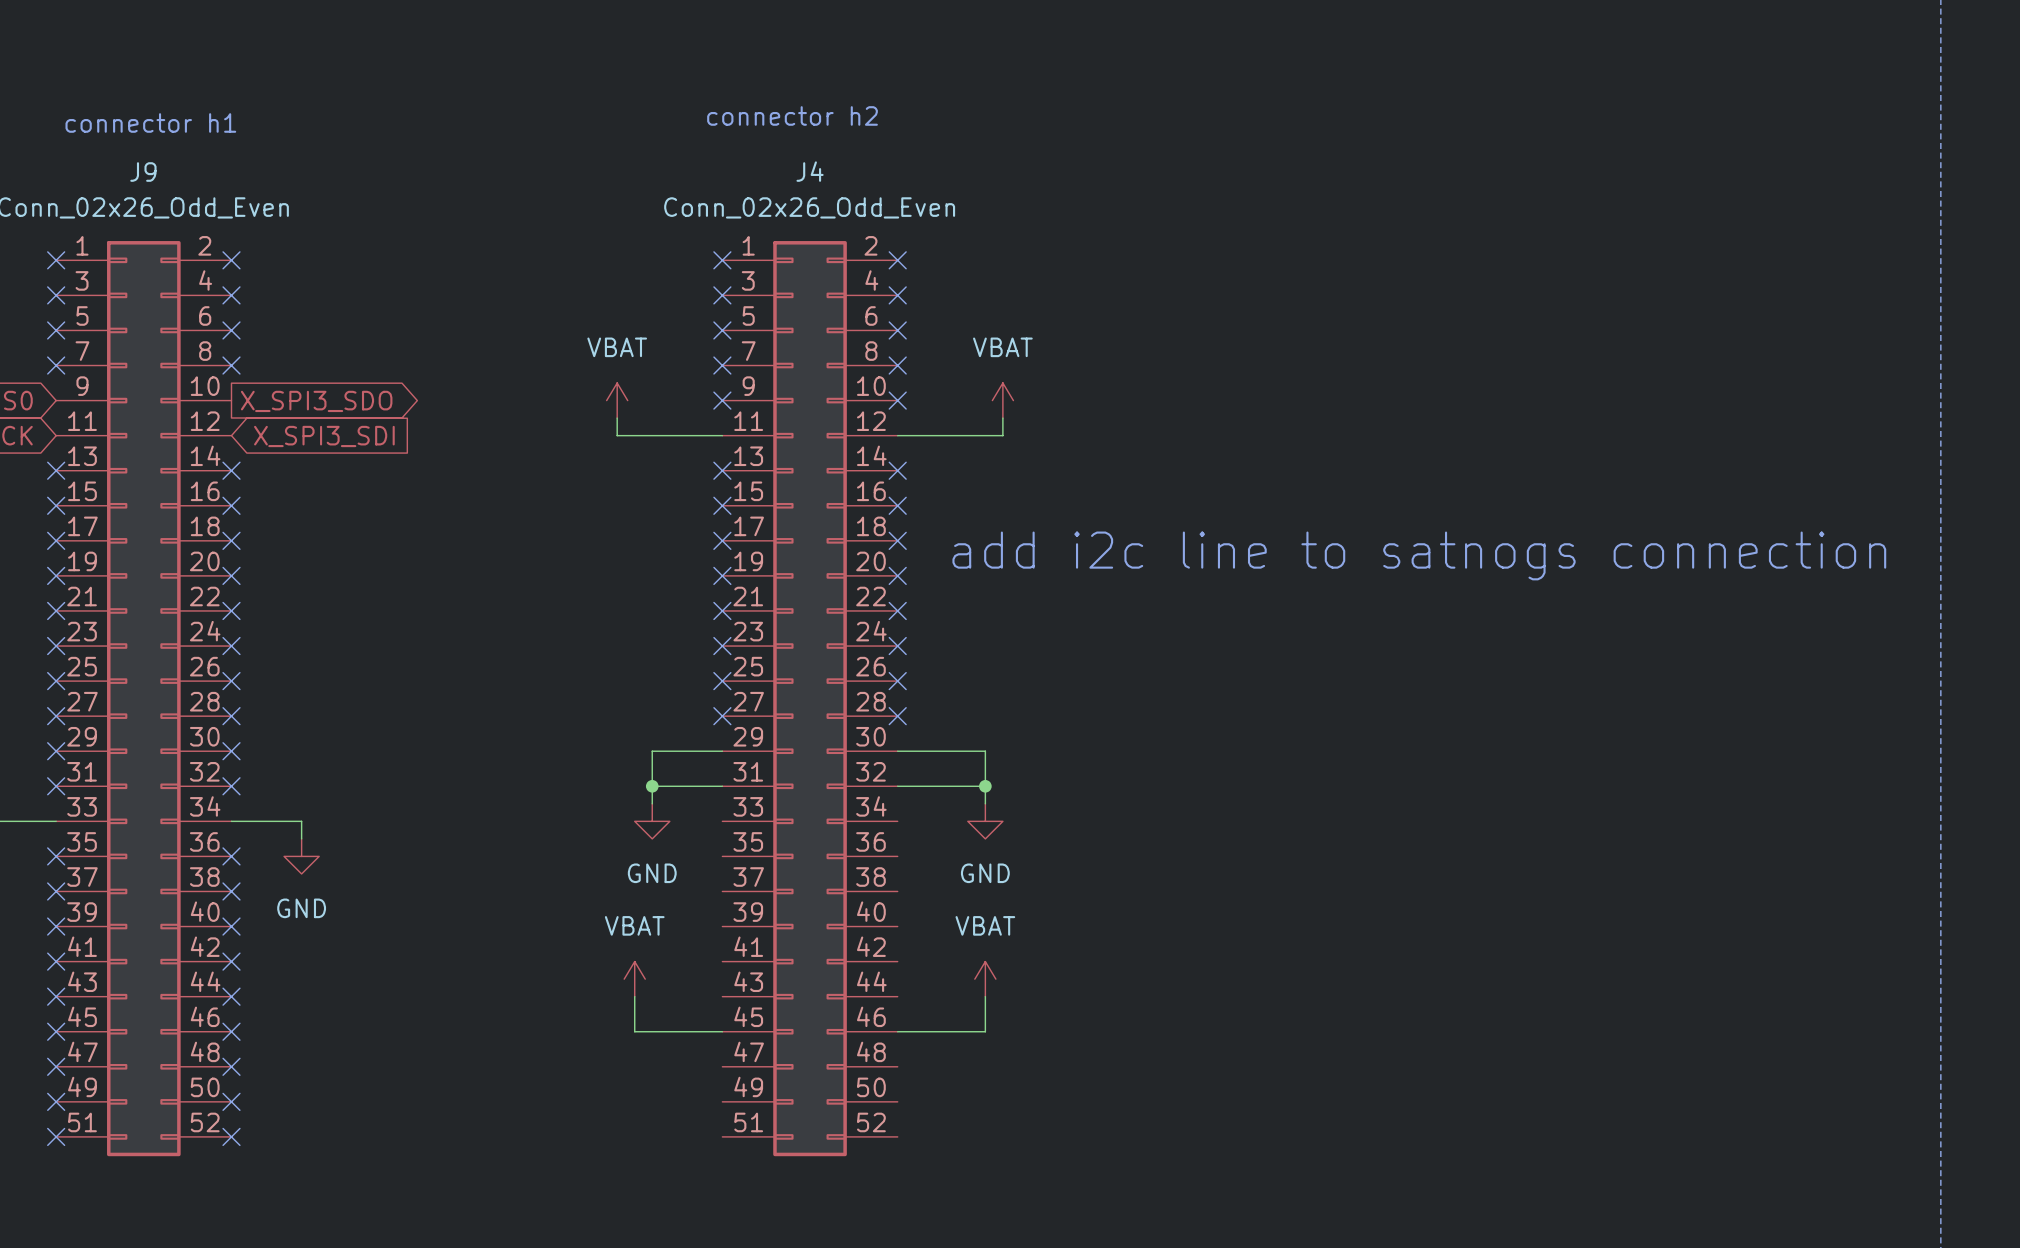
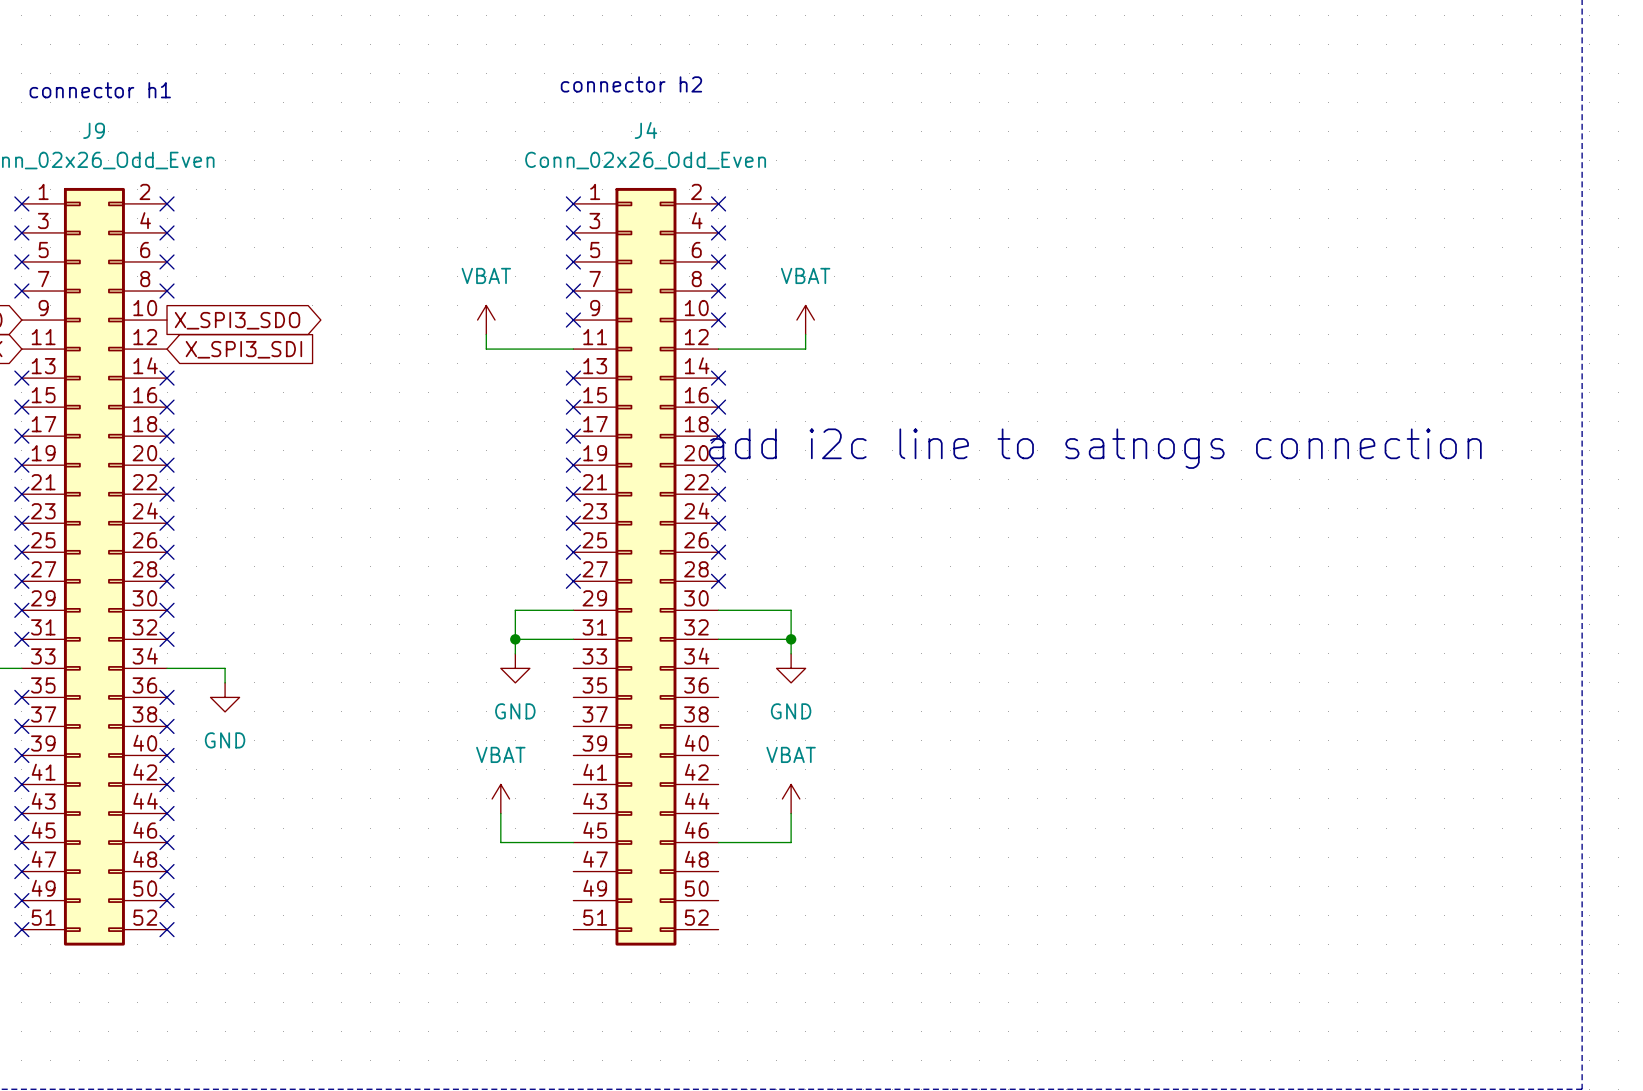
text position: add i2c line to satnogs connection (1419, 555) -> add i2c line to satnogs connection (1095, 448)

